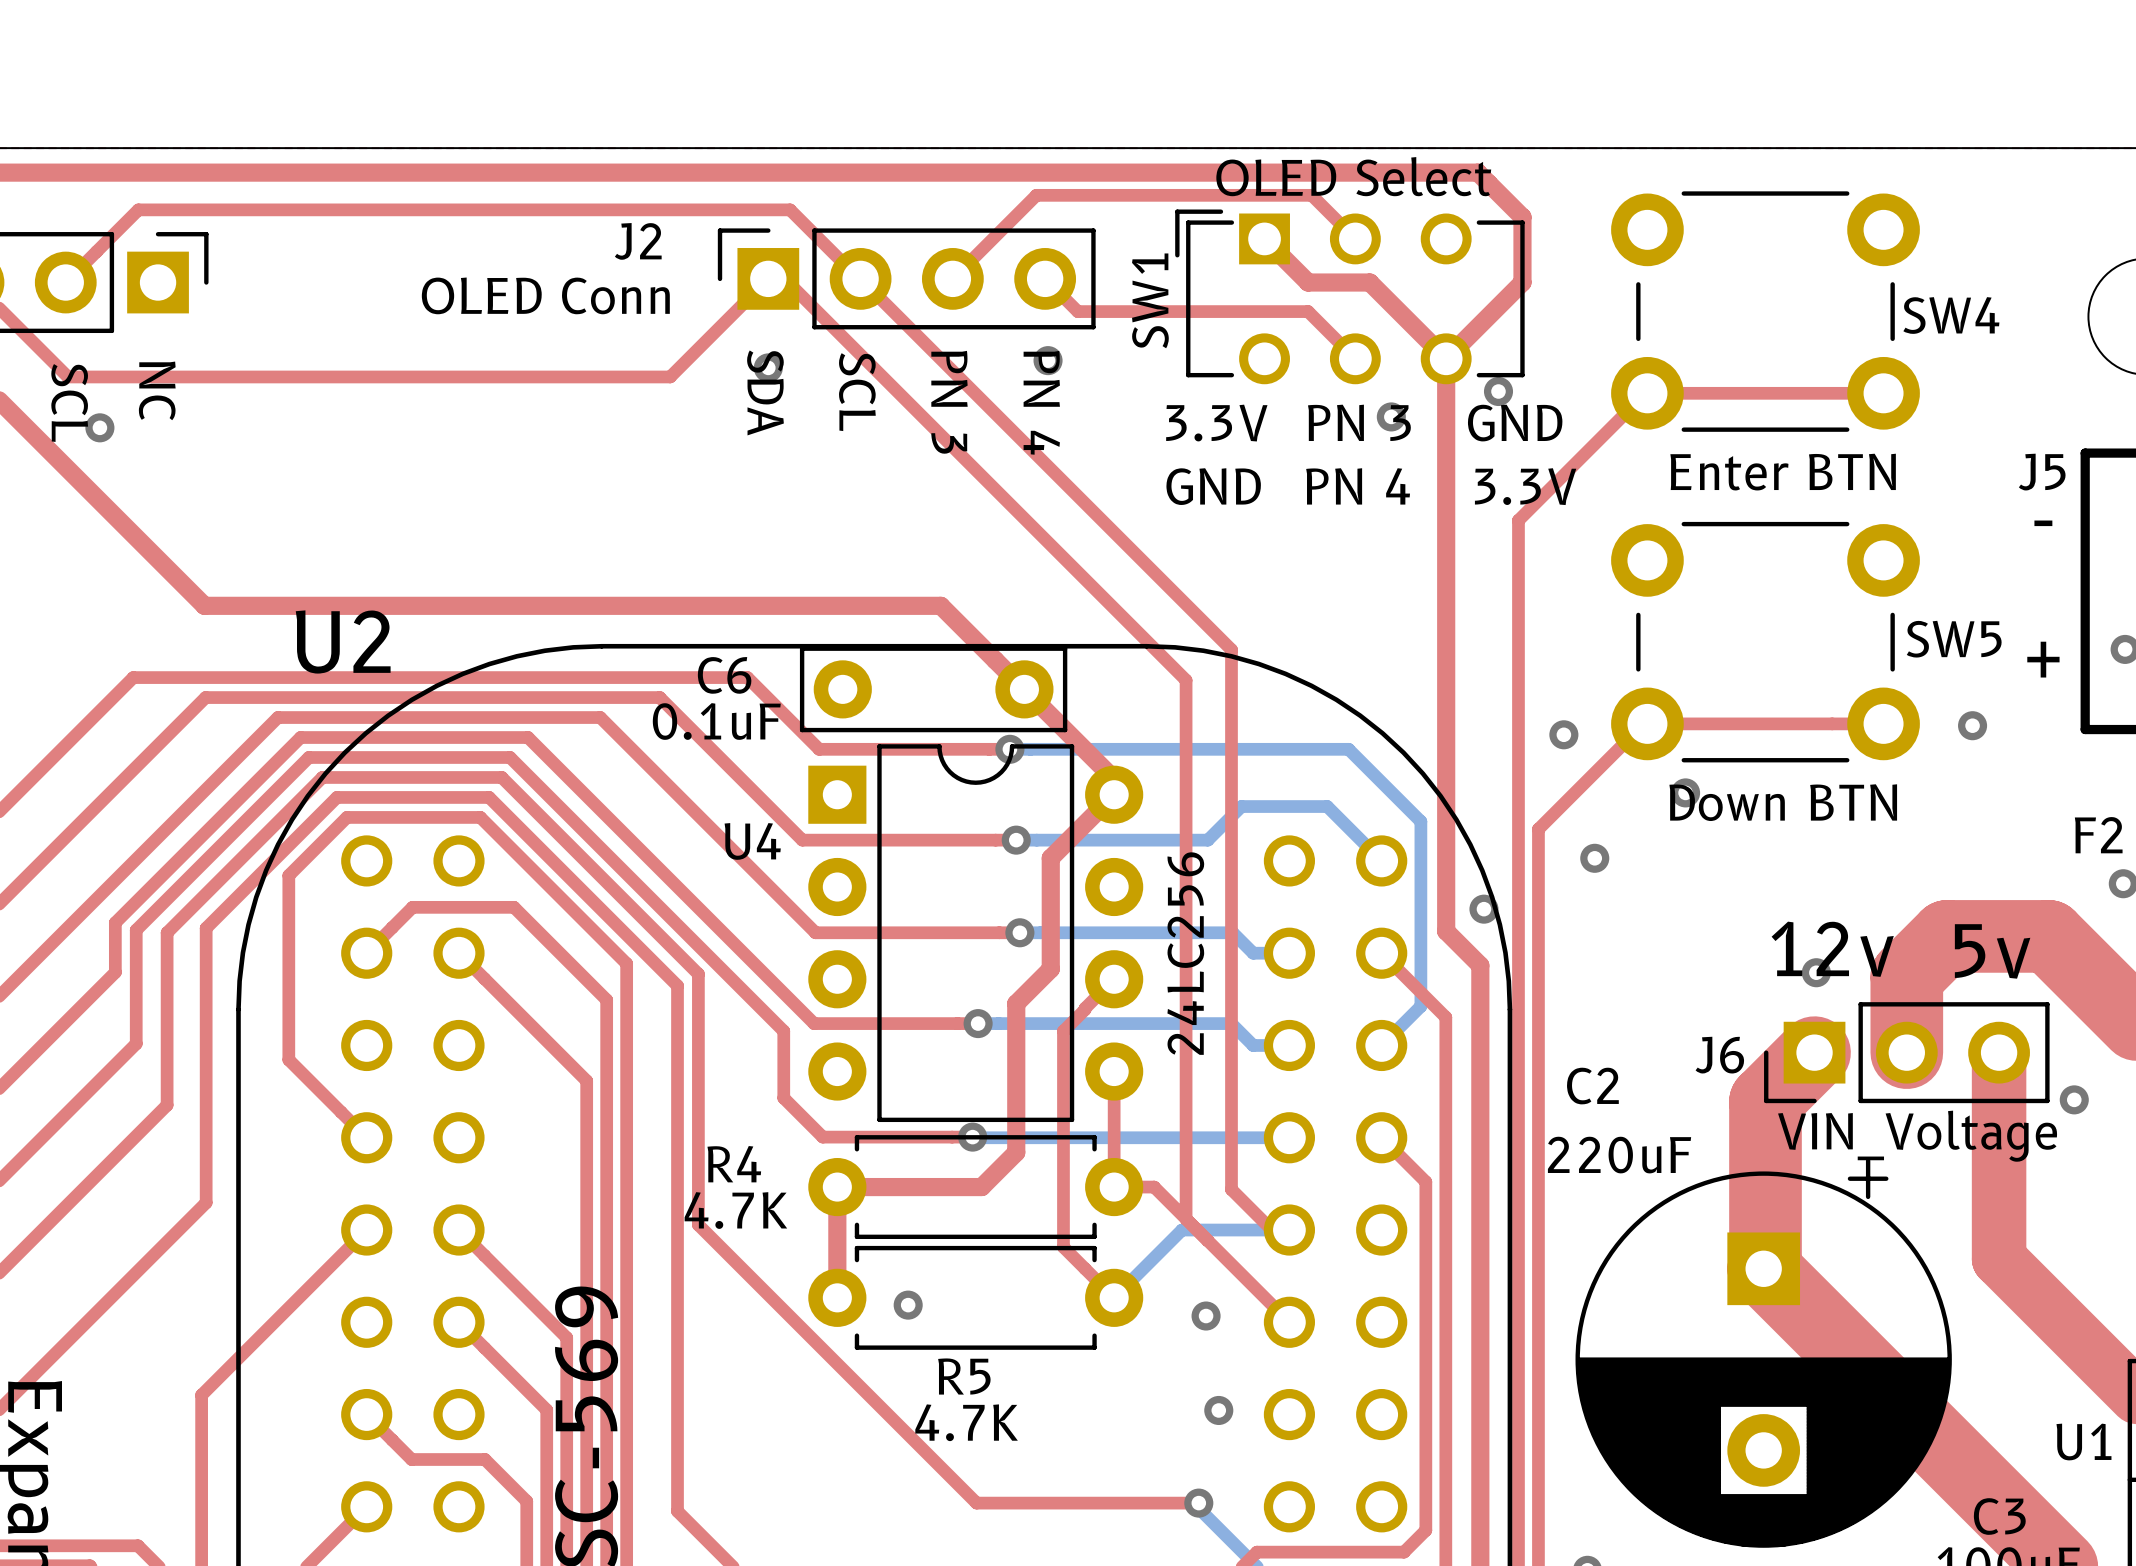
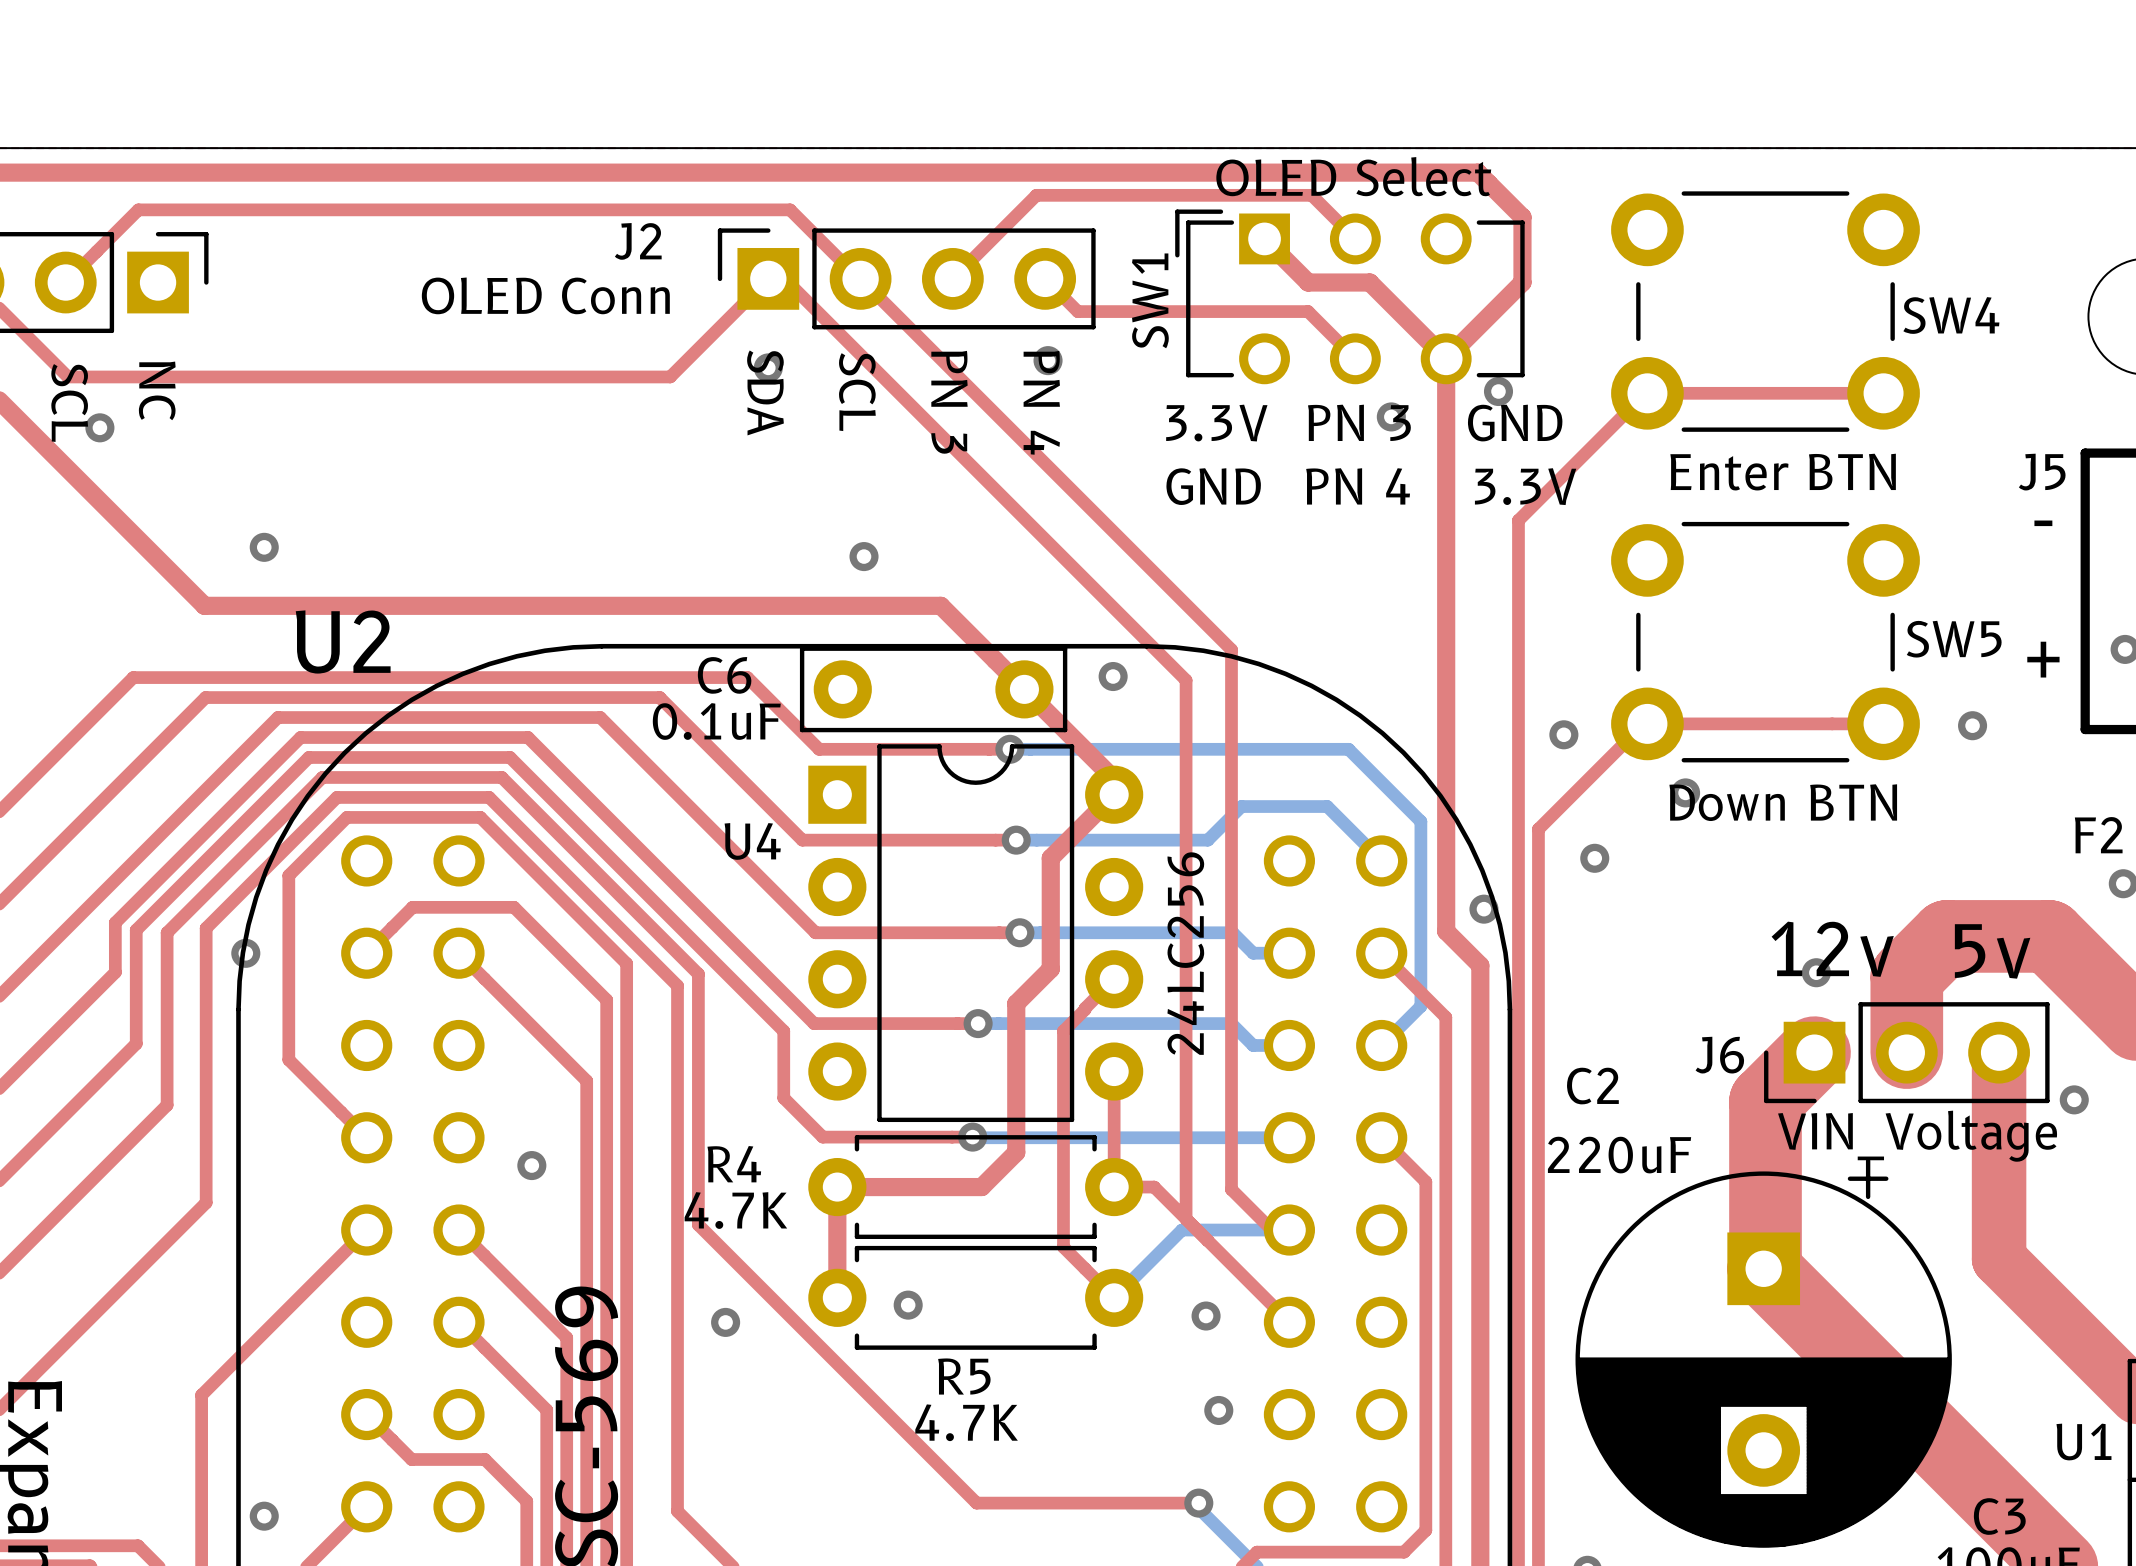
via: none -> (264, 547)
via: none -> (864, 556)
via: none -> (1113, 676)
via: none -> (245, 953)
via: none -> (531, 1165)
via: none -> (725, 1322)
via: none -> (264, 1516)

